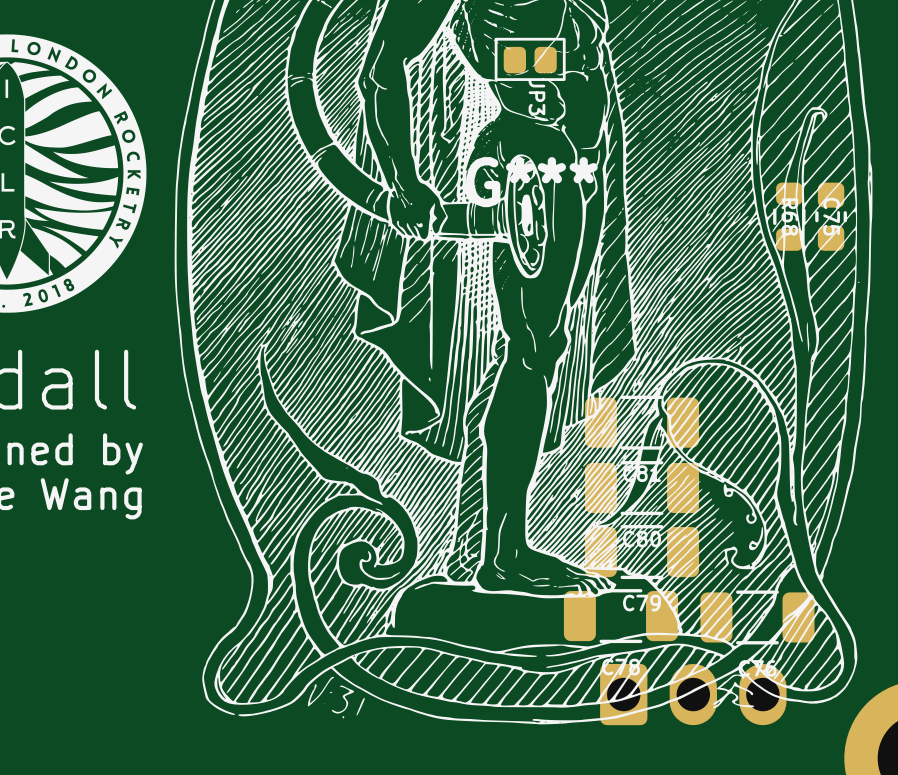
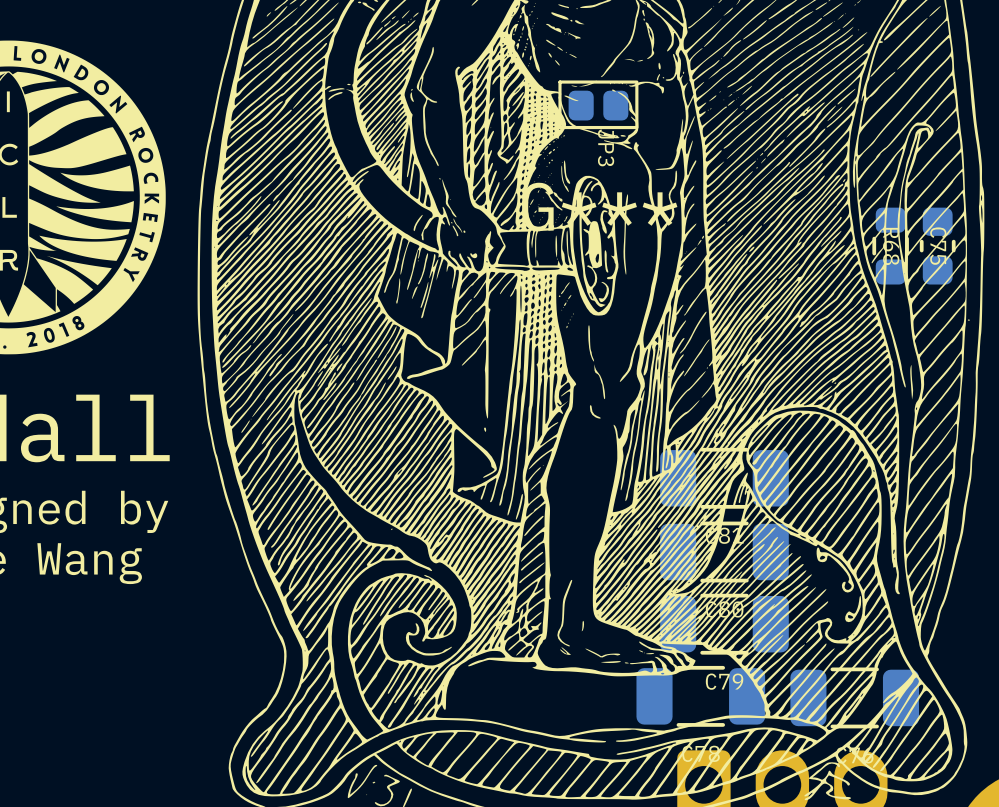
JP3 position: (530, 59) -> (598, 104)

